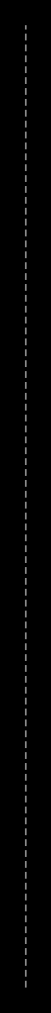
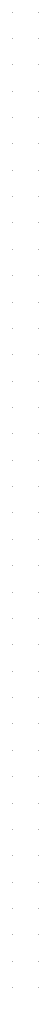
line: (25, 25) (25, 987) -> none

